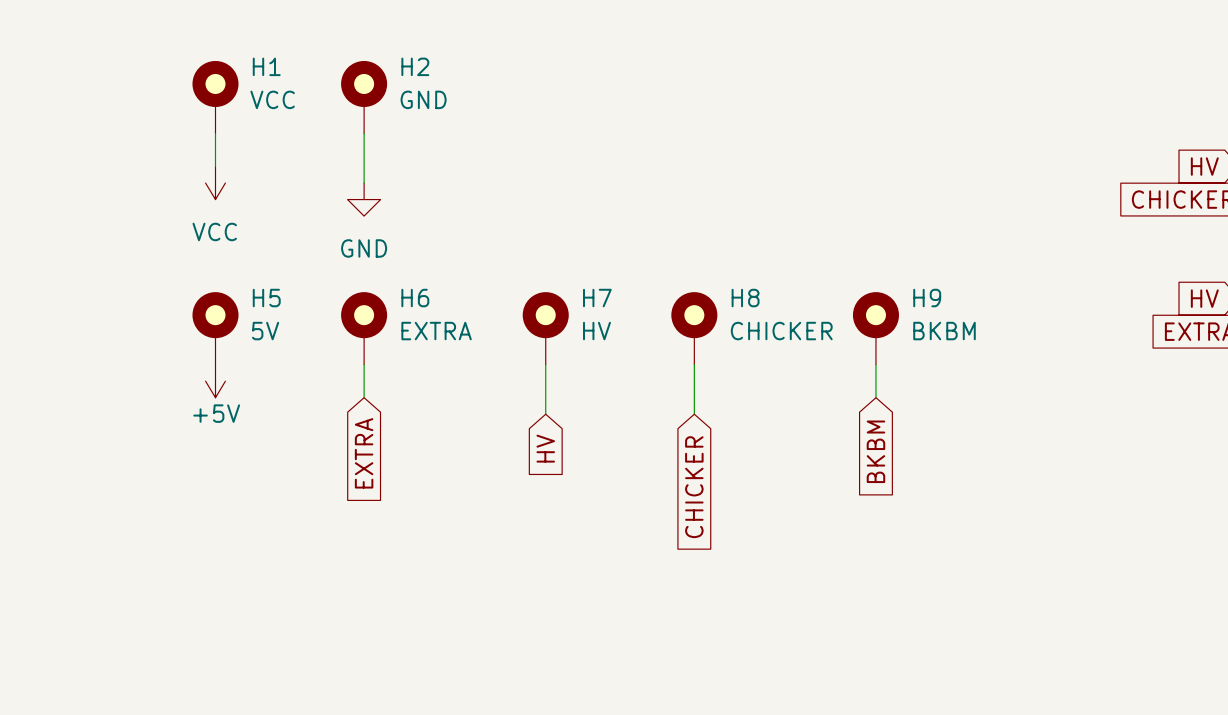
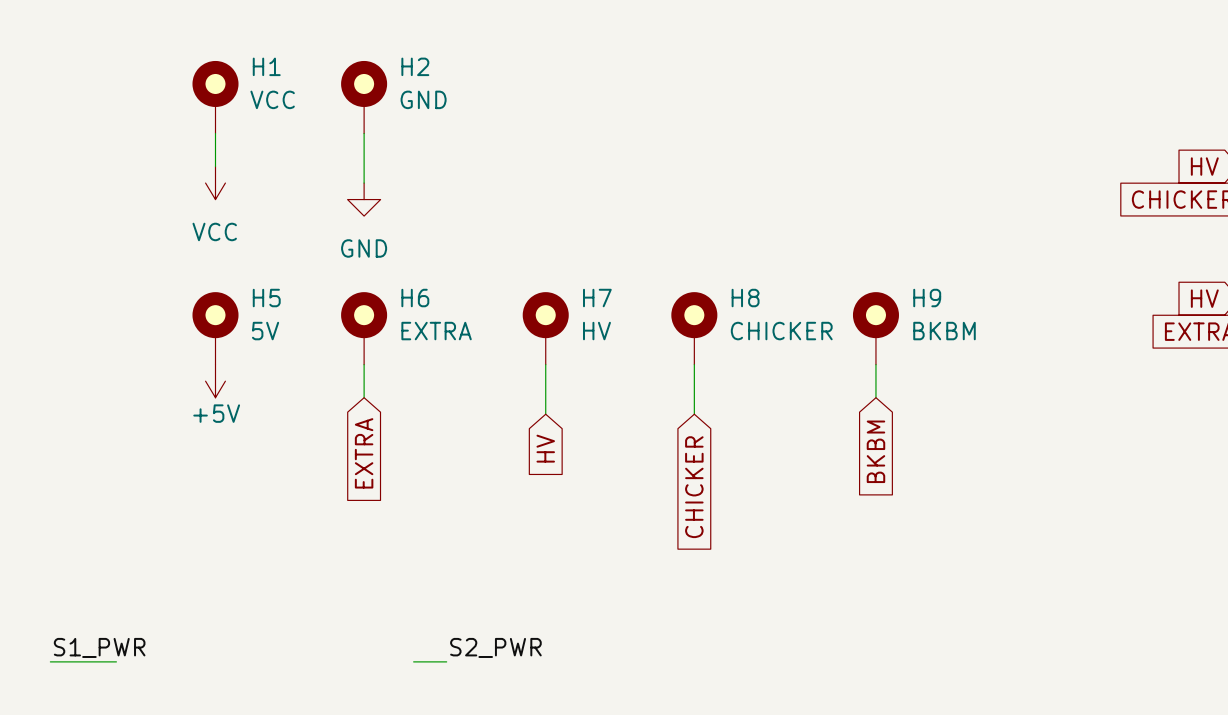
label: none -> S1_PWR (99, 647)
label: none -> S2_PWR (495, 647)
wire: none -> (50, 661) (116, 661)
wire: none -> (413, 661) (446, 661)

